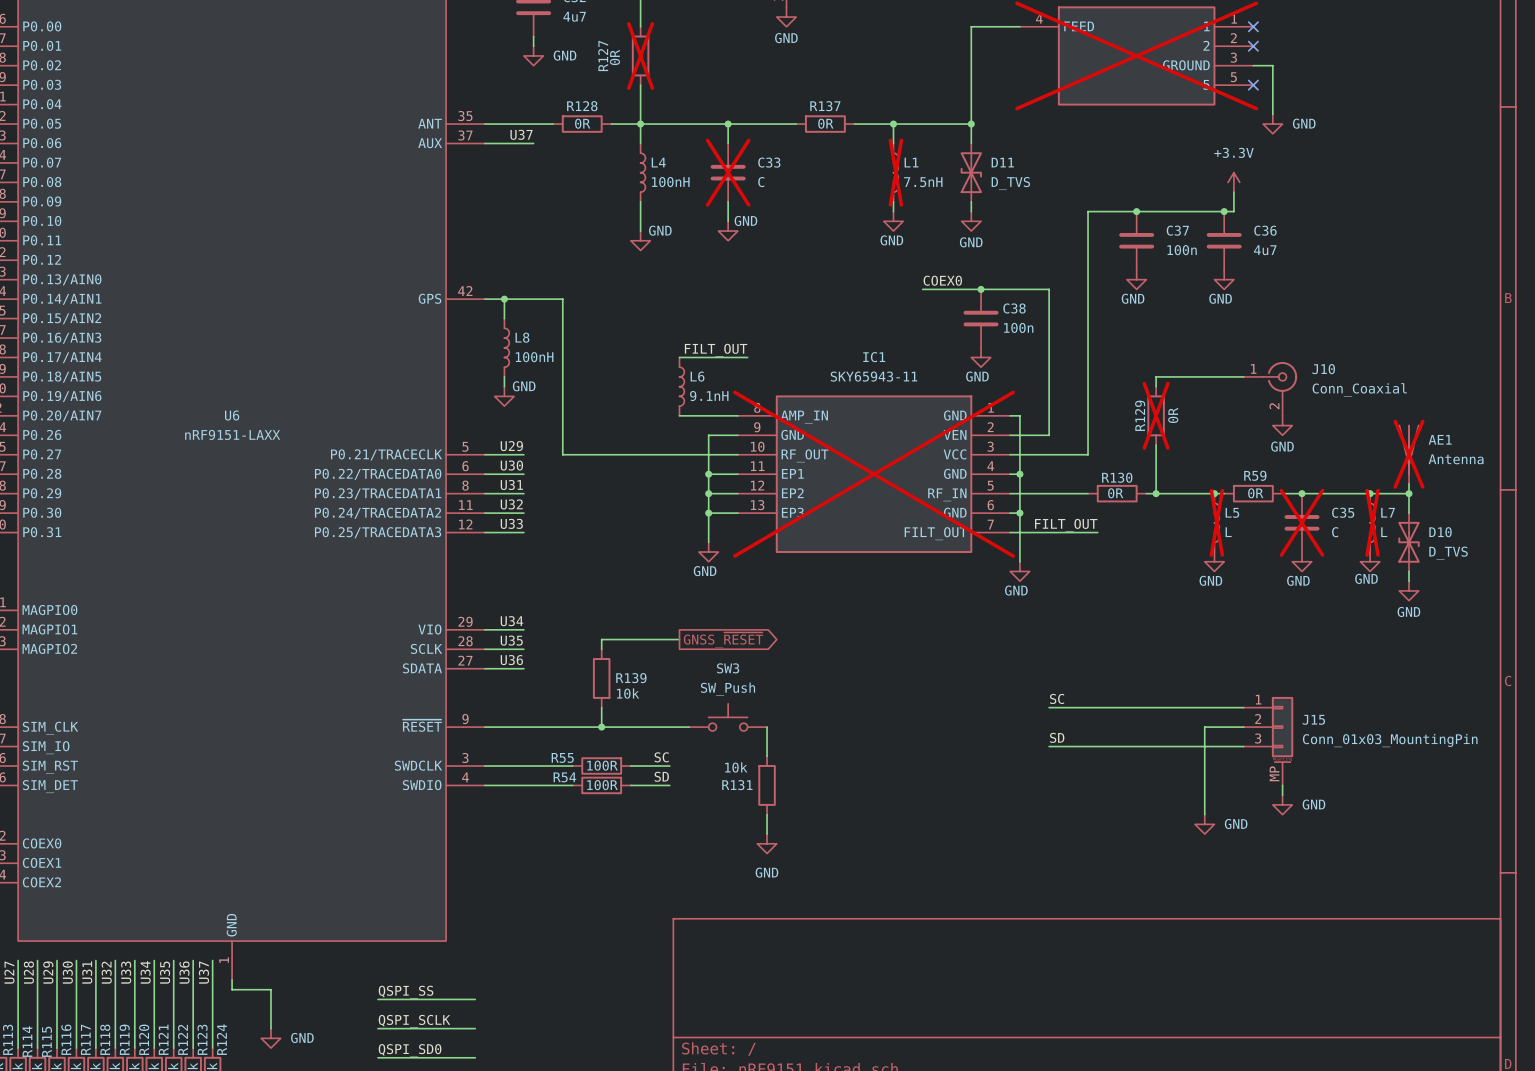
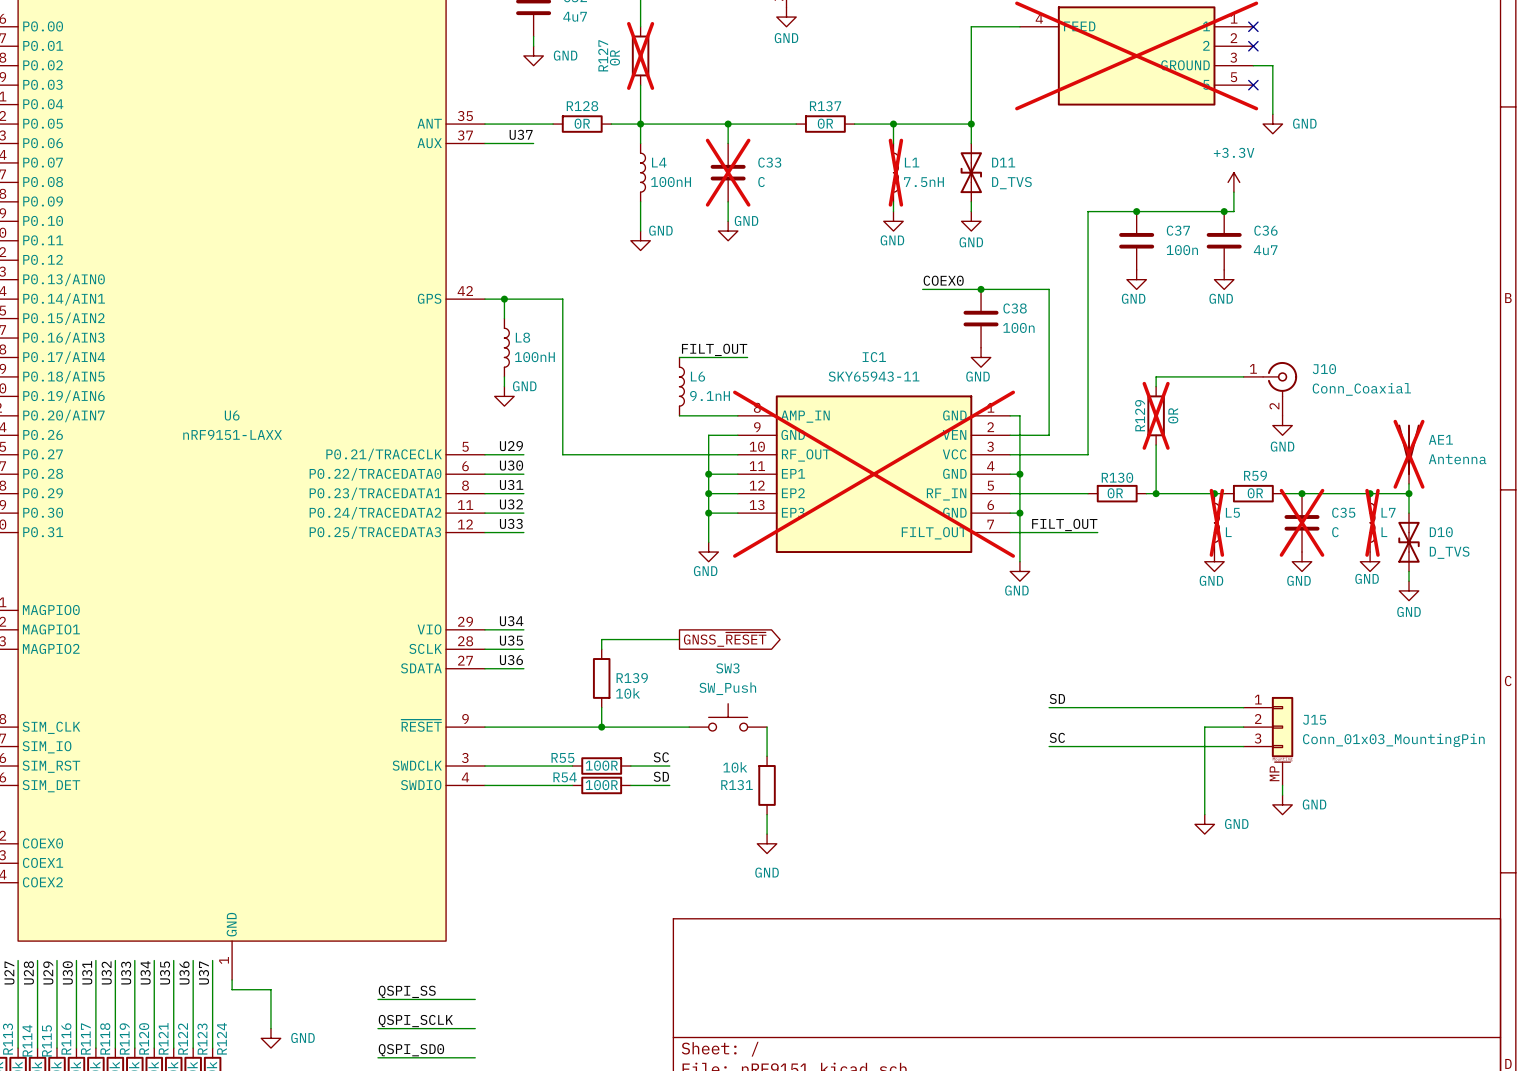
label: SC (1057, 698) -> SD (1057, 698)
label: SD (1057, 737) -> SC (1057, 737)

